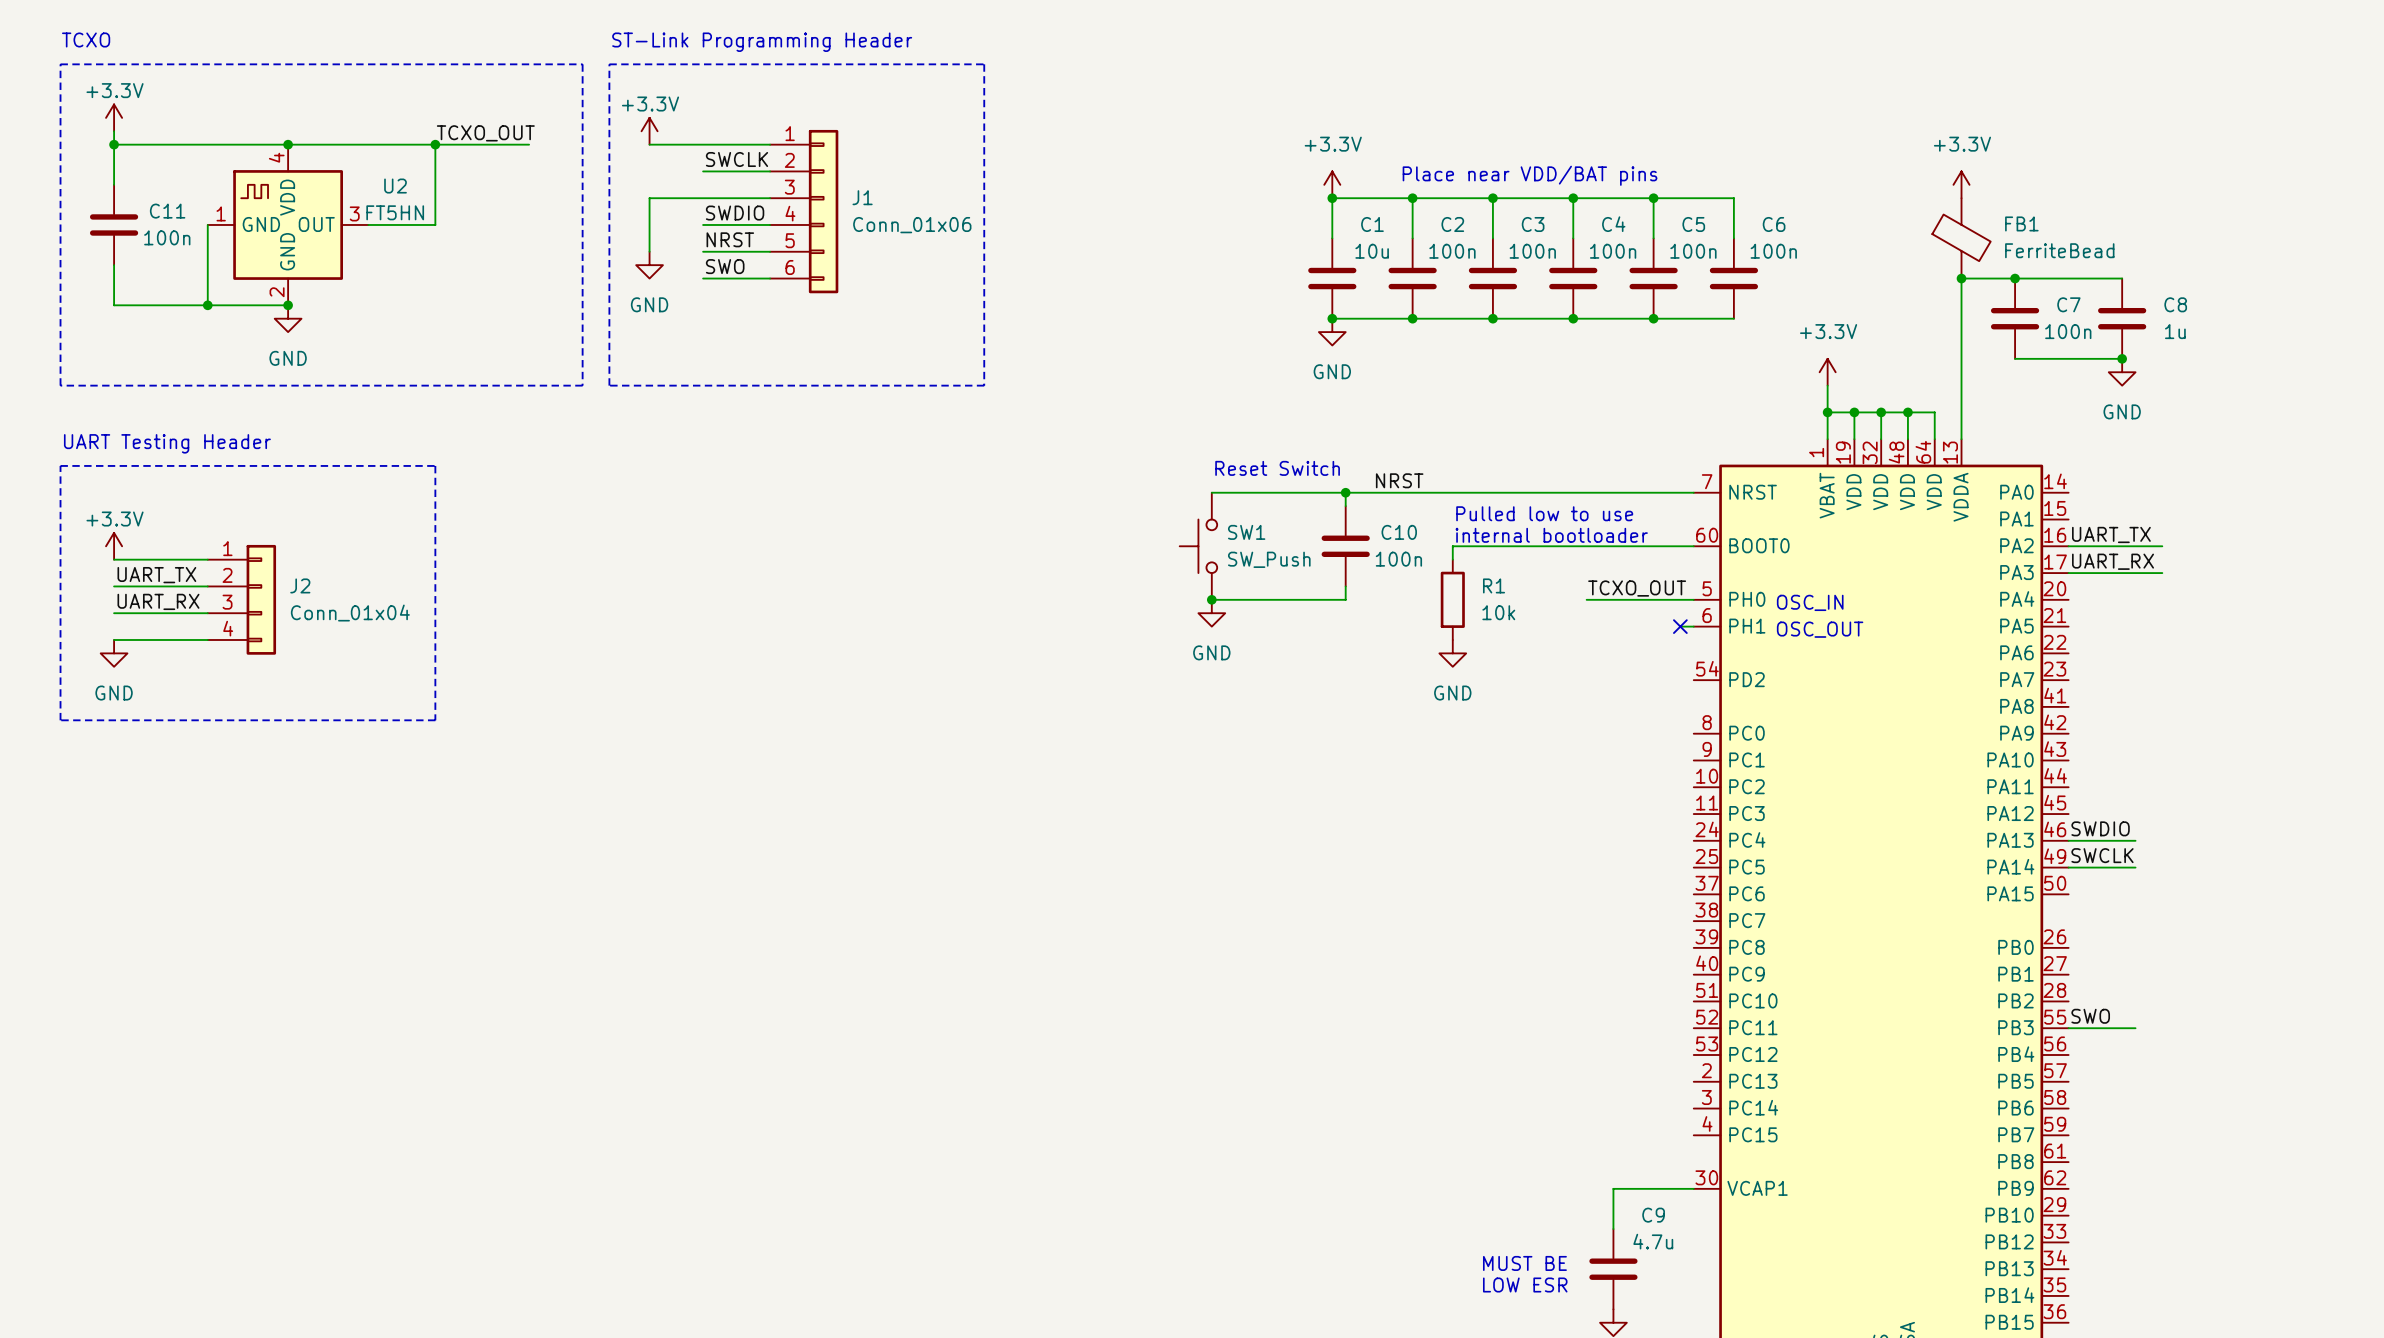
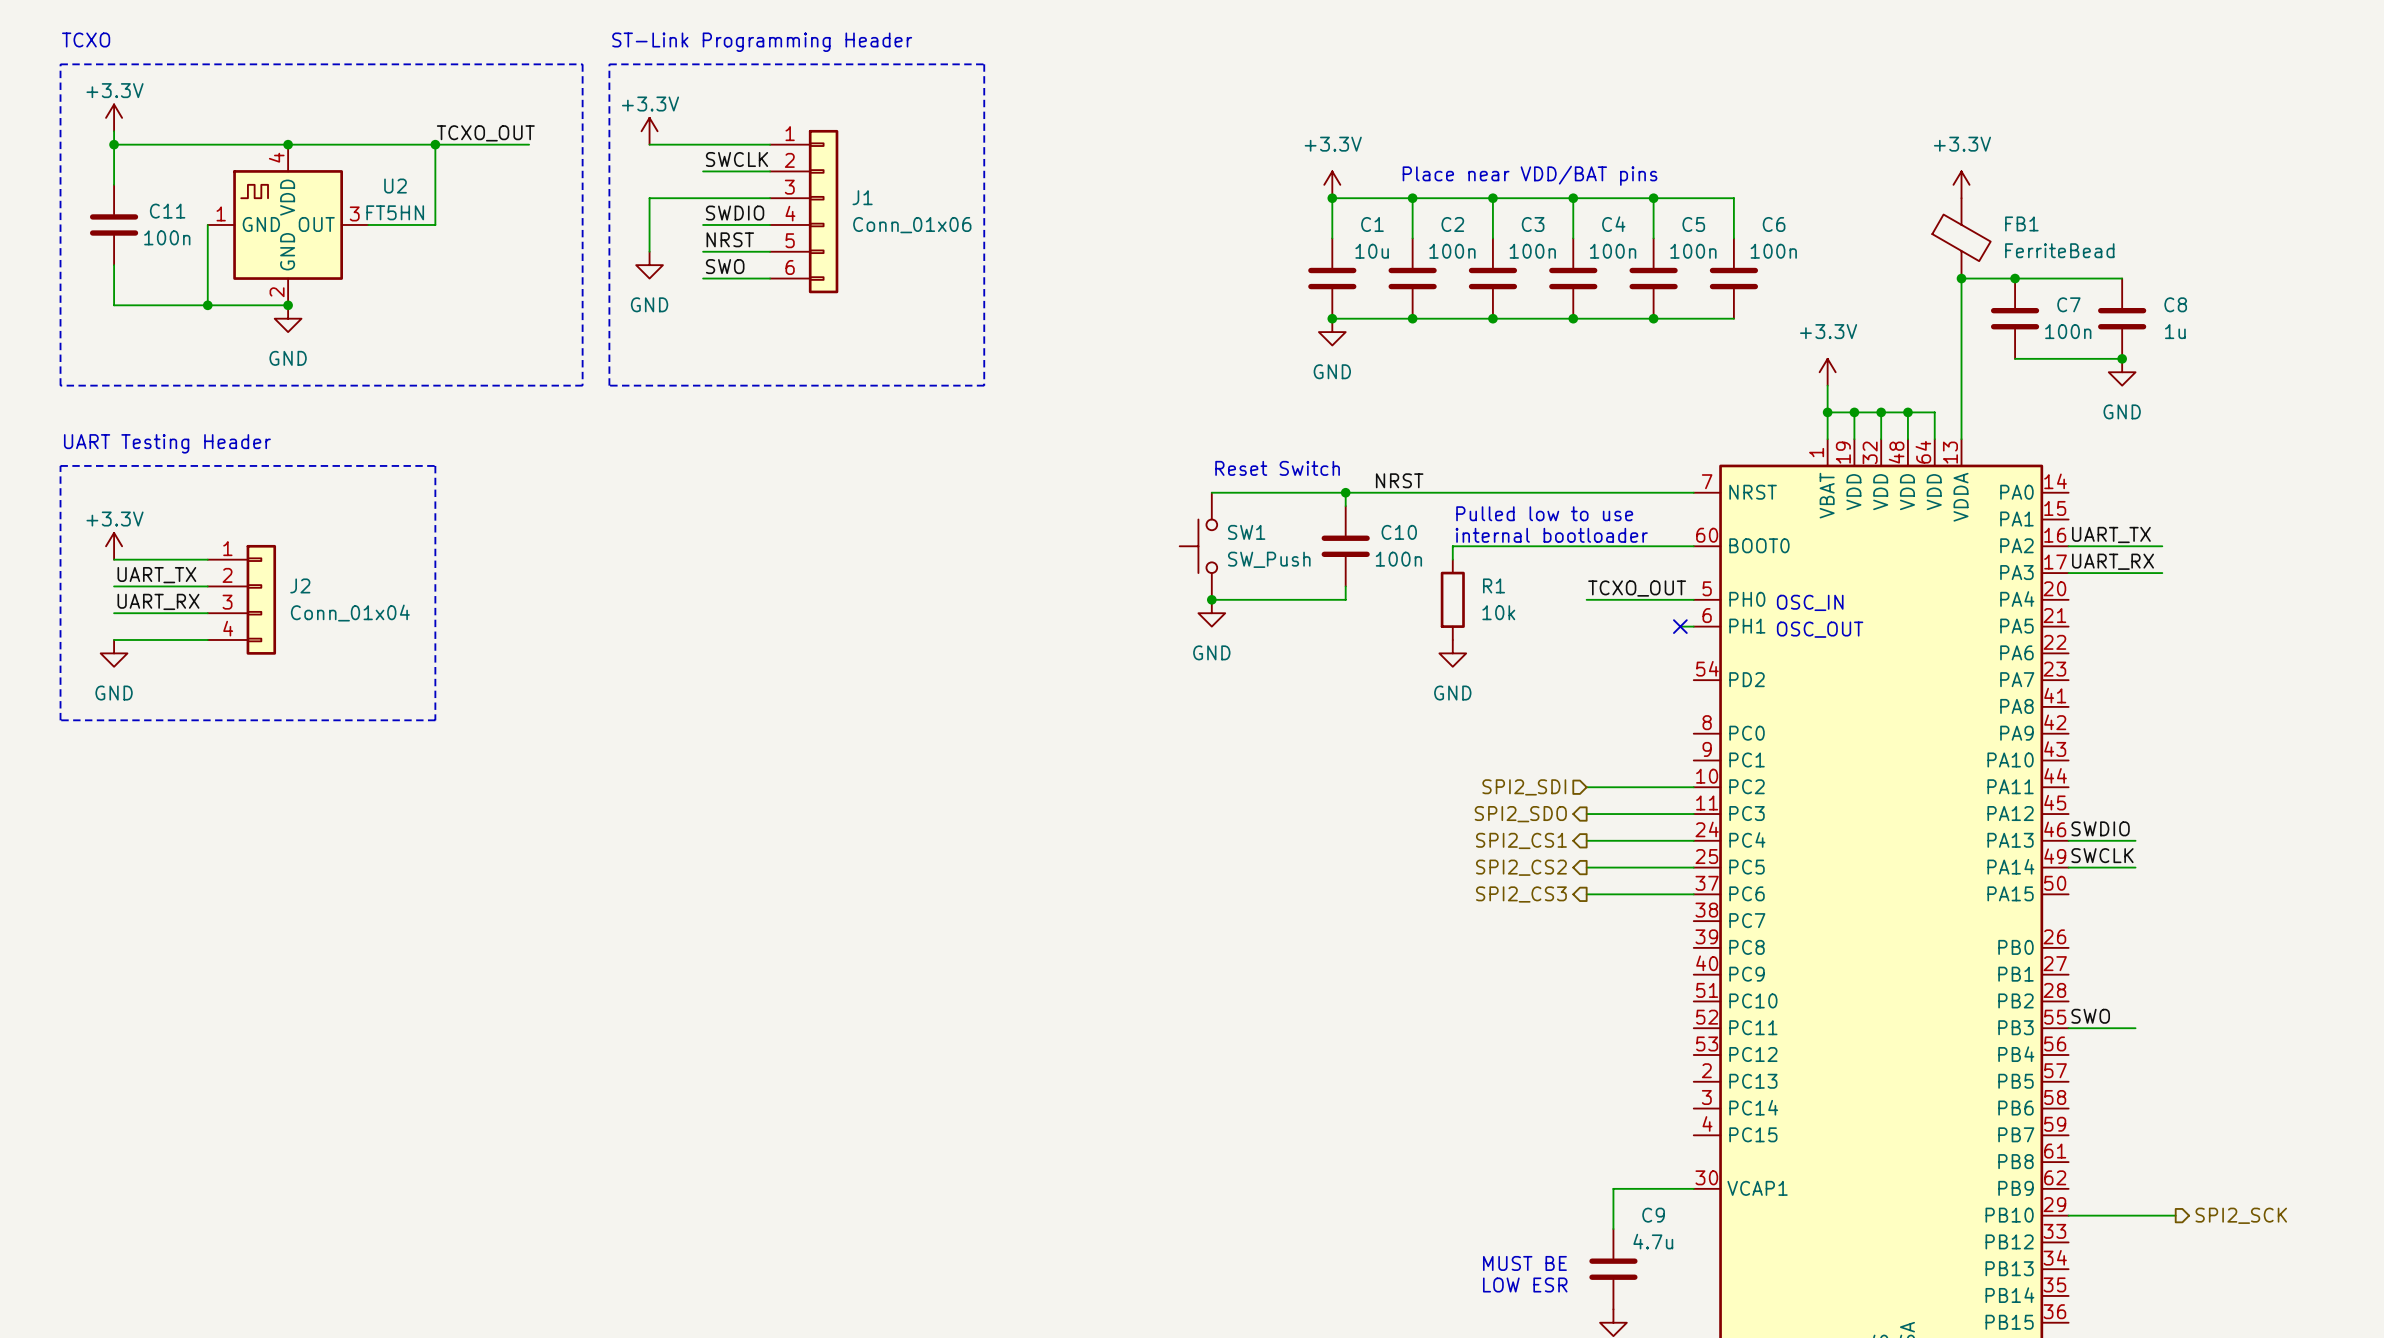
hierarchical label: none -> SPI2_SDI (1524, 787)
wire: none -> (1586, 787) (1693, 787)
hierarchical label: none -> SPI2_SDO (1520, 814)
wire: none -> (1586, 814) (1693, 814)
hierarchical label: none -> SPI2_CS1 (1521, 840)
wire: none -> (1586, 840) (1693, 840)
hierarchical label: none -> SPI2_CS2 (1521, 867)
wire: none -> (1586, 867) (1693, 867)
hierarchical label: none -> SPI2_CS3 (1521, 894)
wire: none -> (1586, 894) (1693, 894)
wire: none -> (2068, 1215) (2175, 1215)
hierarchical label: none -> SPI2_SCK (2241, 1215)

